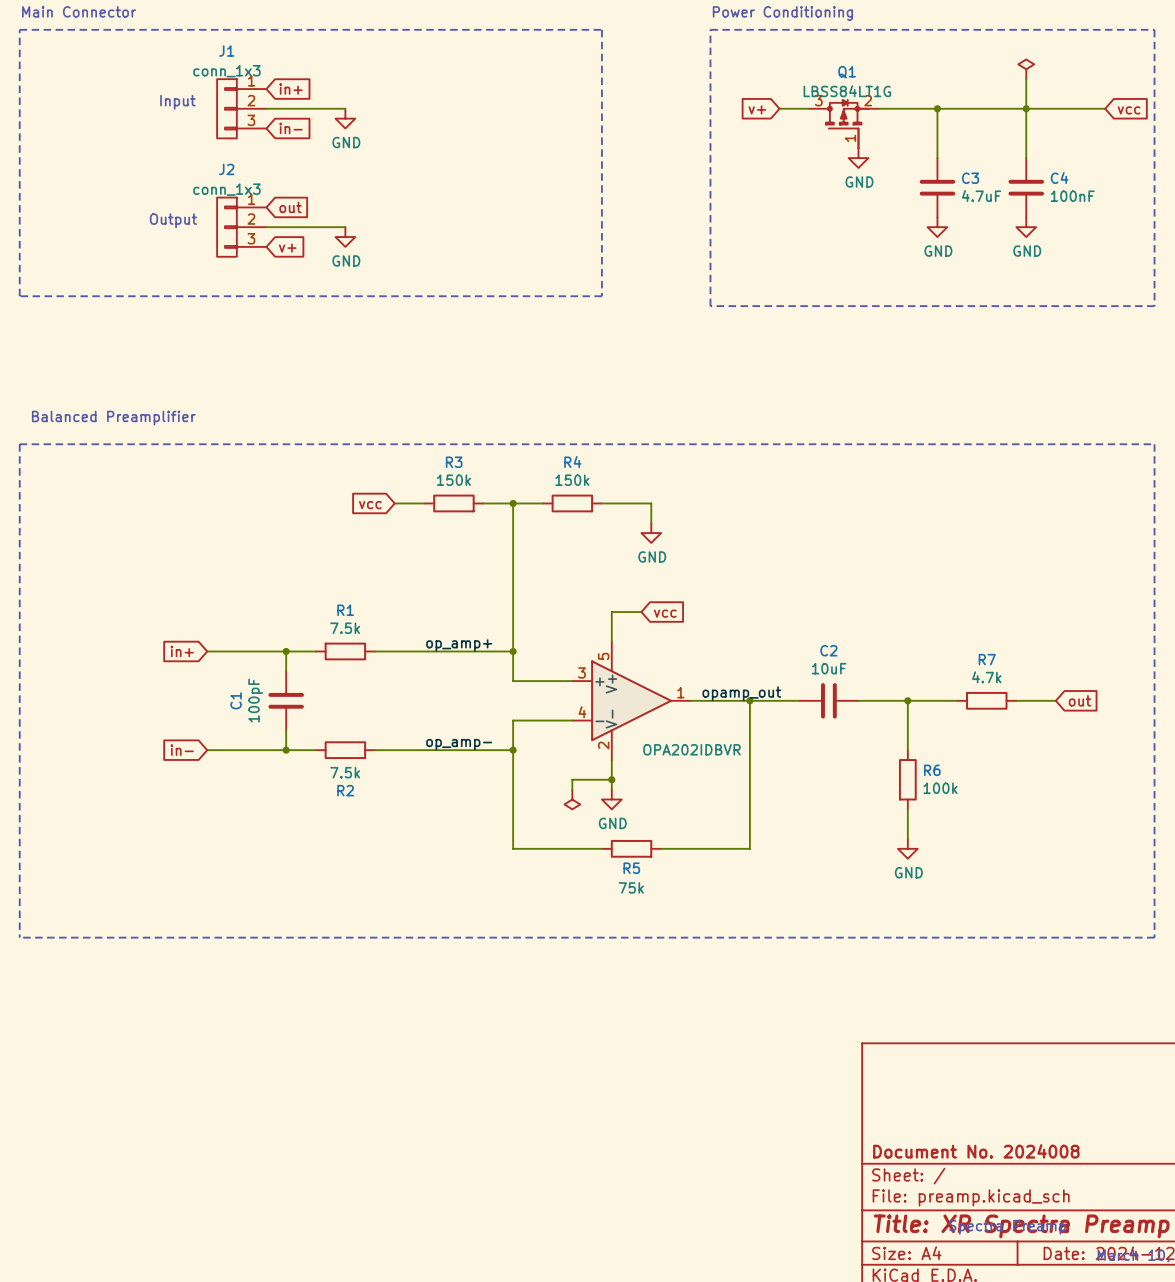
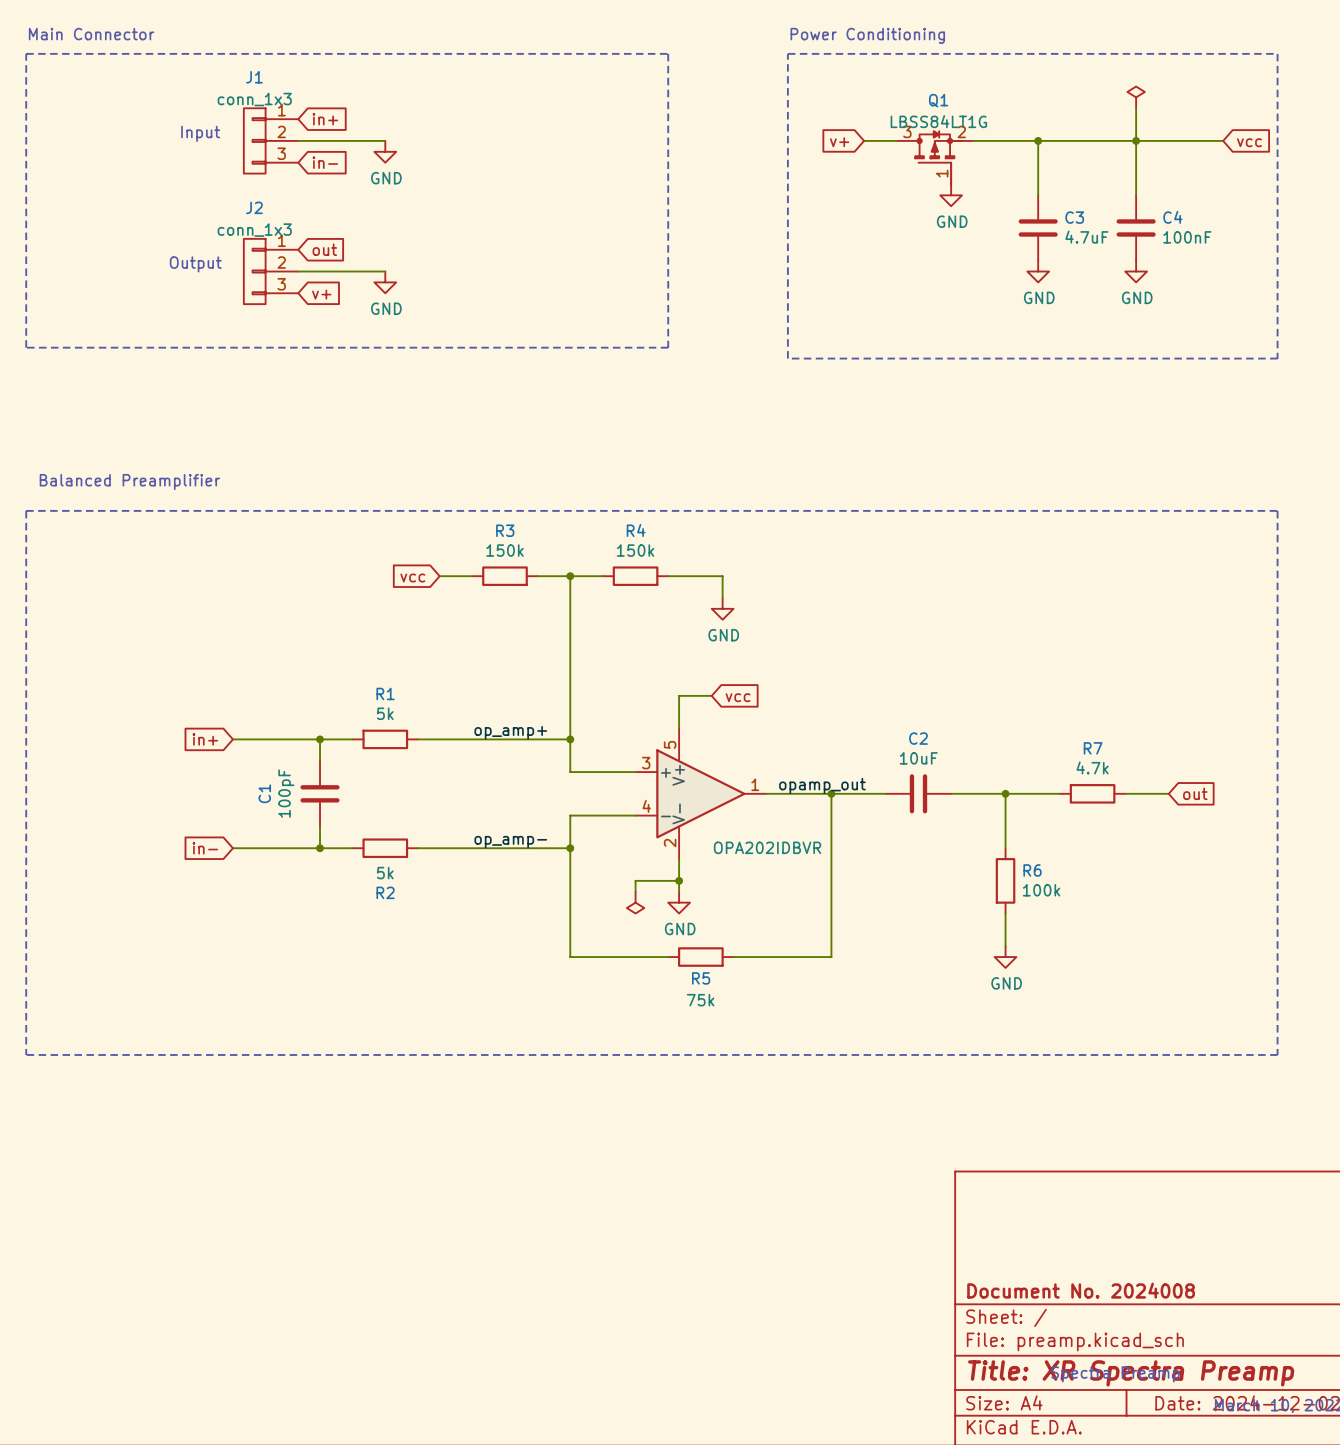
R1 value: 7.5k (345, 628) -> 5k (385, 713)
R2 value: 7.5k (345, 772) -> 5k (385, 873)

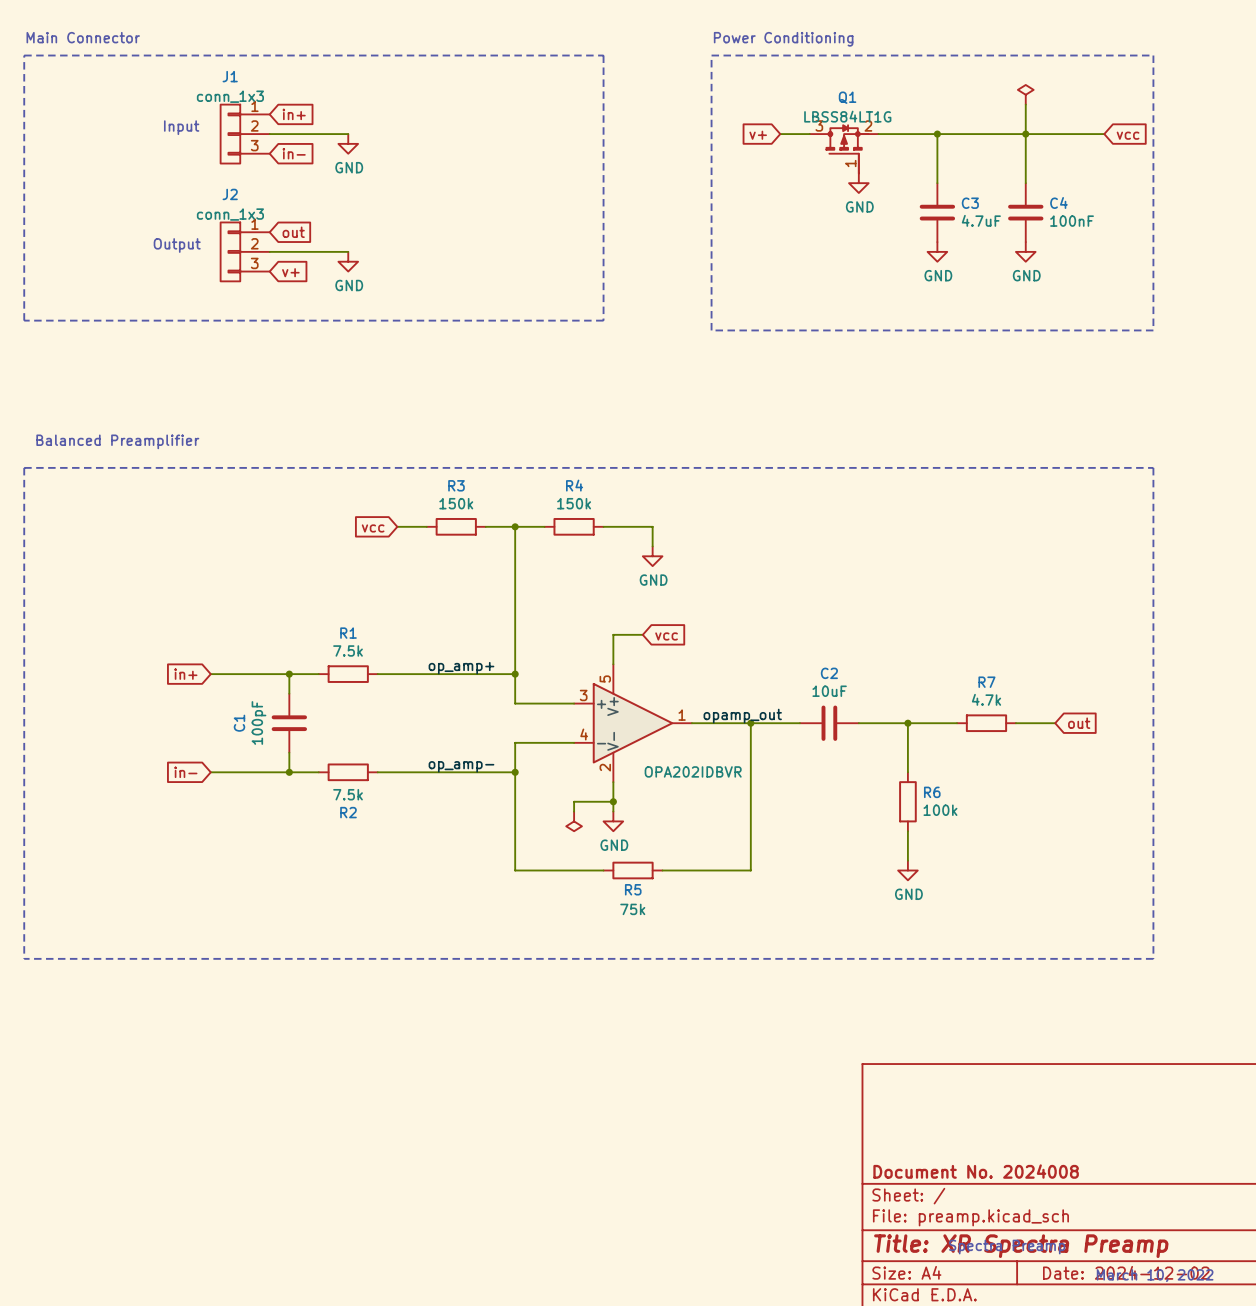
R1 value: 5k (385, 713) -> 7.5k (348, 650)
R2 value: 5k (385, 873) -> 7.5k (348, 794)

